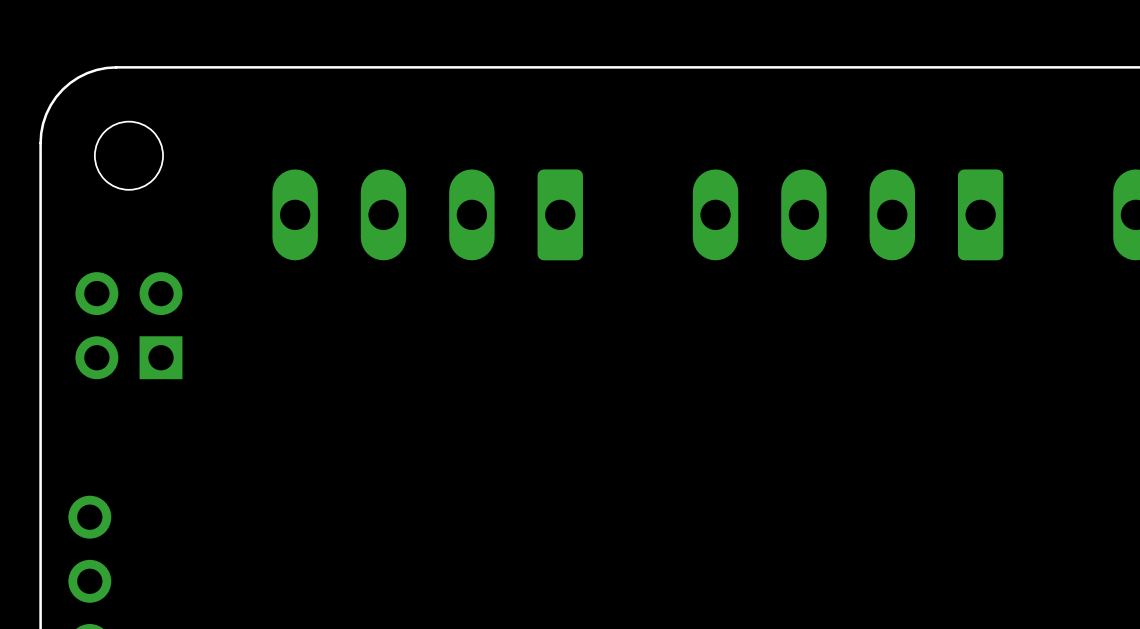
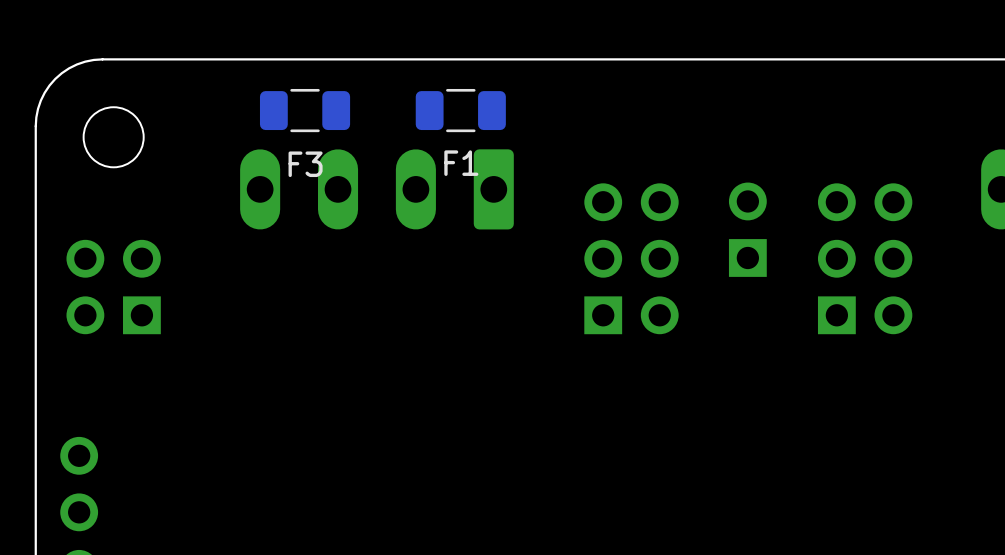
F3: none -> (305, 110)
F1: none -> (460, 110)
part: (848, 214) -> none
part: none -> (747, 229)
part: none -> (631, 258)
part: none -> (865, 258)

